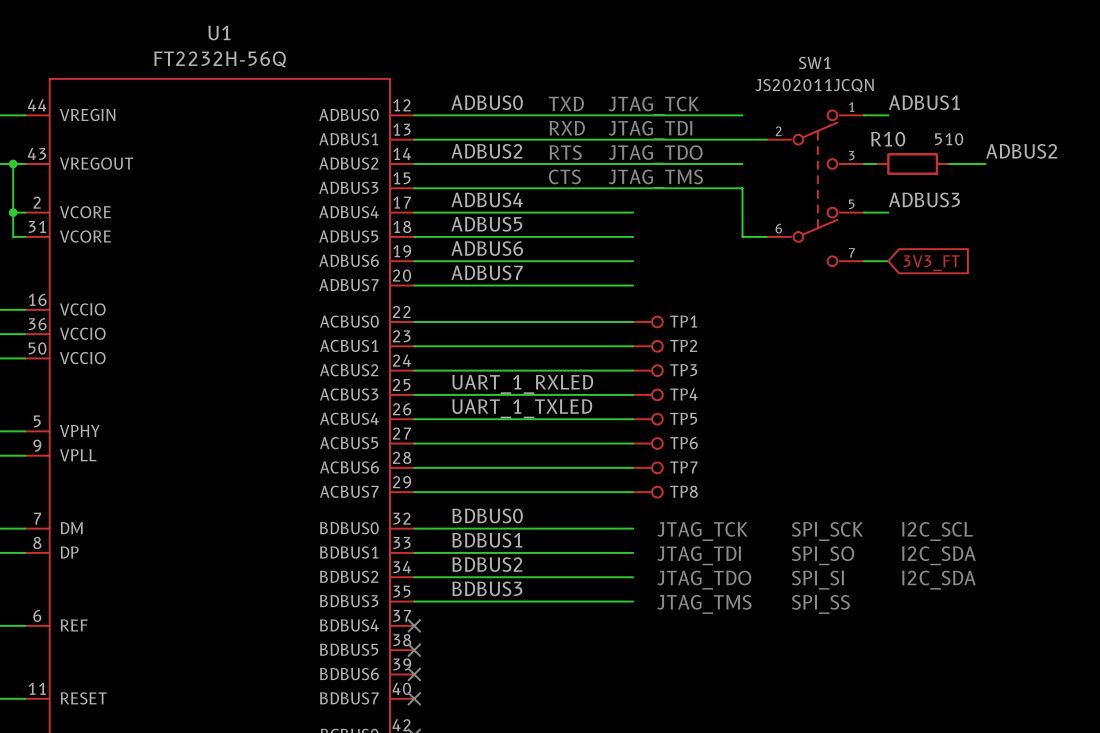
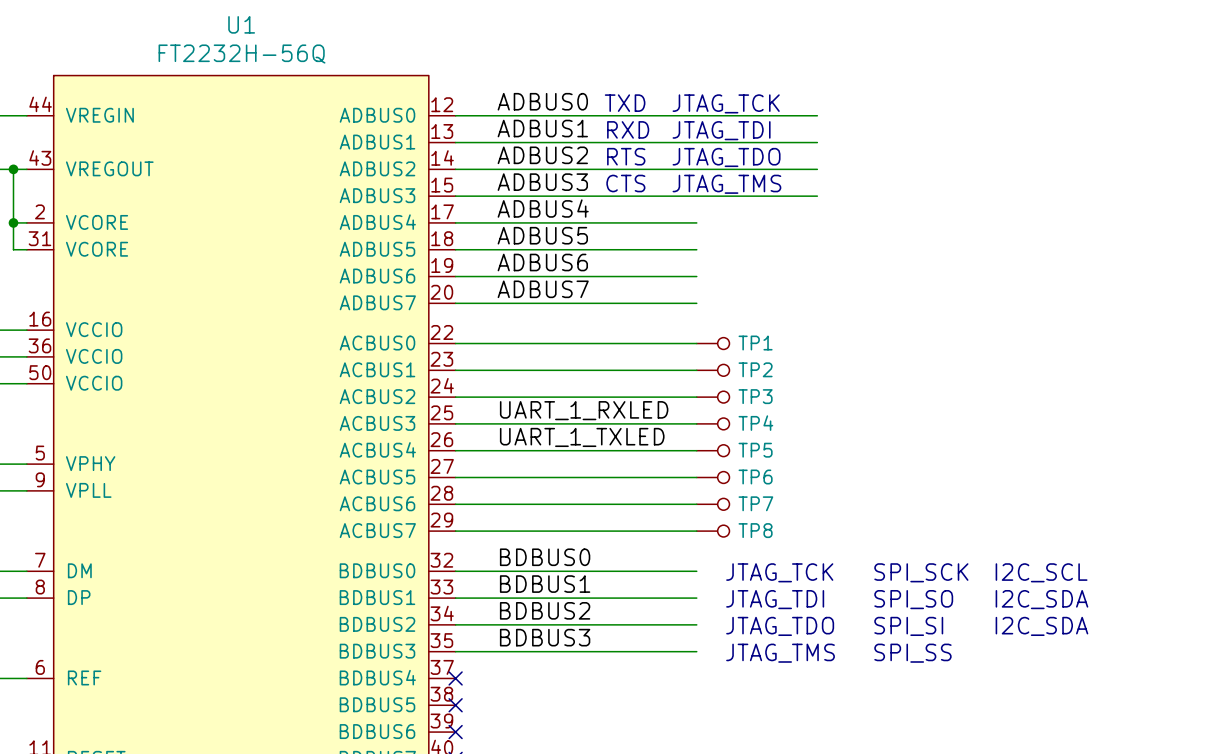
label: ADBUS1 (924, 102) -> none
wire: (864, 115) (888, 115) -> none
label: none -> ADBUS1 (542, 128)
wire: (742, 139) (766, 139) -> none
label: ADBUS2 (1021, 151) -> none
wire: (864, 163) (876, 163) -> none
R10: (912, 163) -> none
wire: (949, 163) (985, 163) -> none
label: none -> ADBUS3 (542, 182)
wire: (742, 188) (742, 236) (766, 236) -> none
SW1: JS202011JCQN (815, 188) -> none
label: ADBUS3 (924, 199) -> none
wire: (864, 212) (888, 212) -> none
wire: (864, 261) (888, 261) -> none
global label: 3V3_FT (931, 263) -> none

